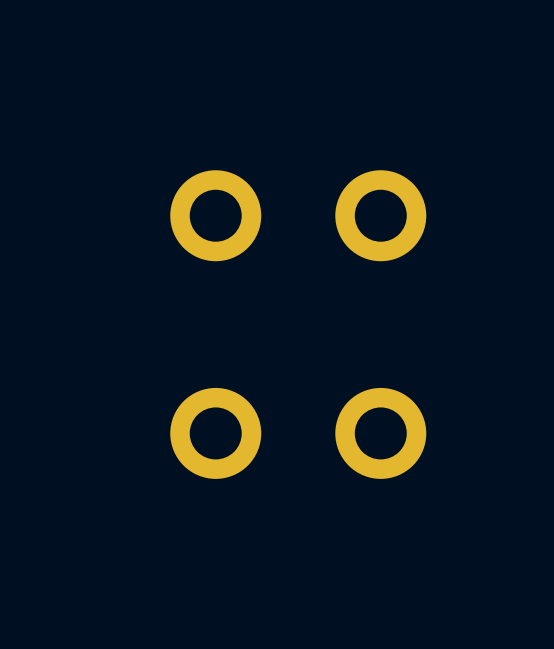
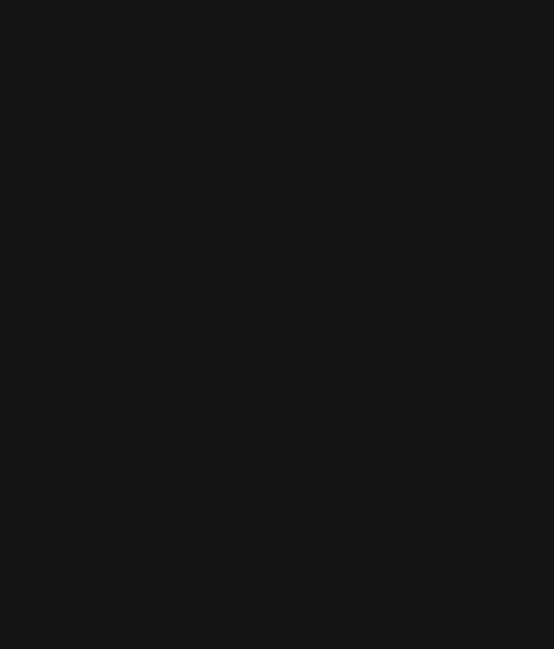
part: (298, 215) -> none
part: (298, 433) -> none

